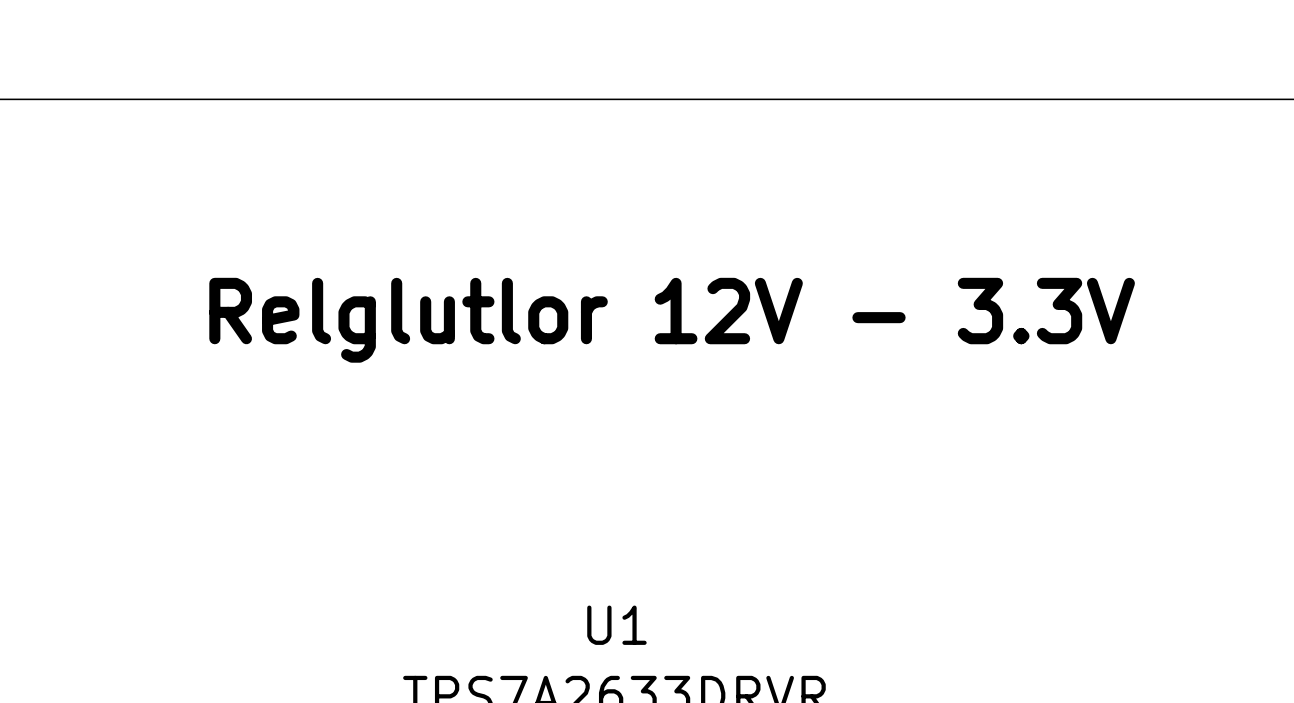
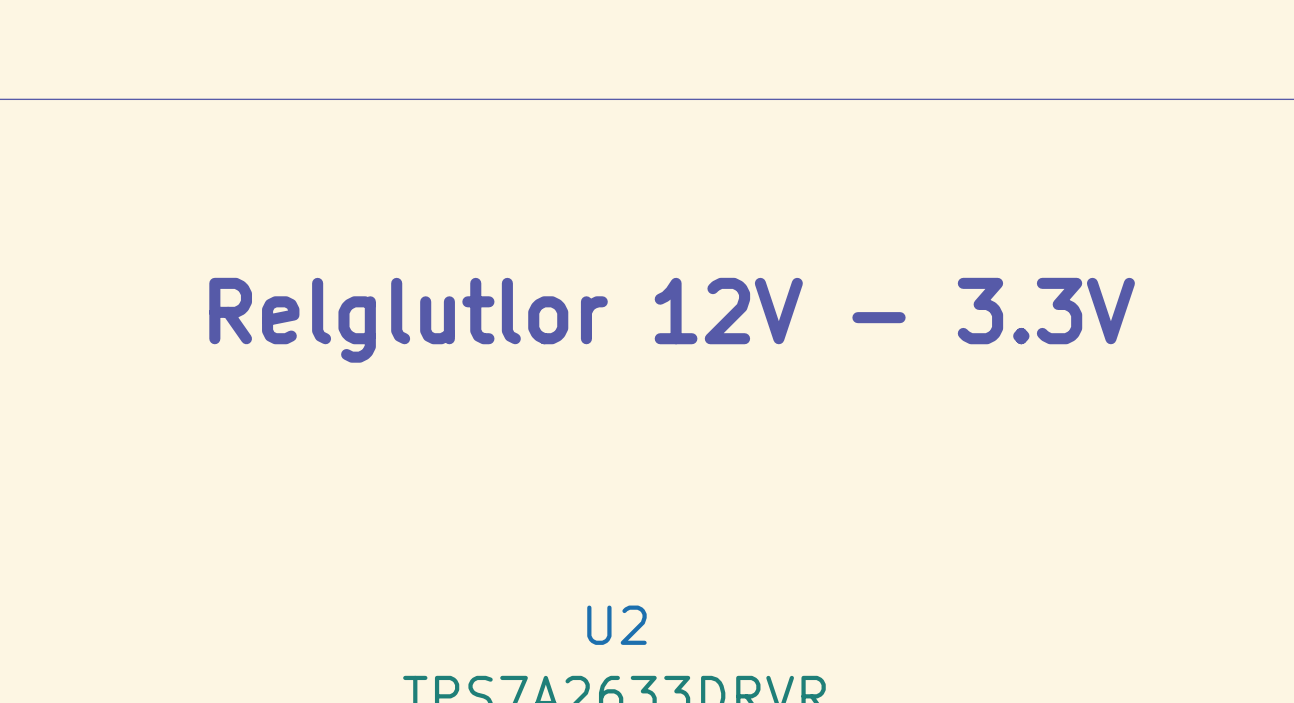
U1 name: U1 (616, 625) -> U2 (616, 625)

